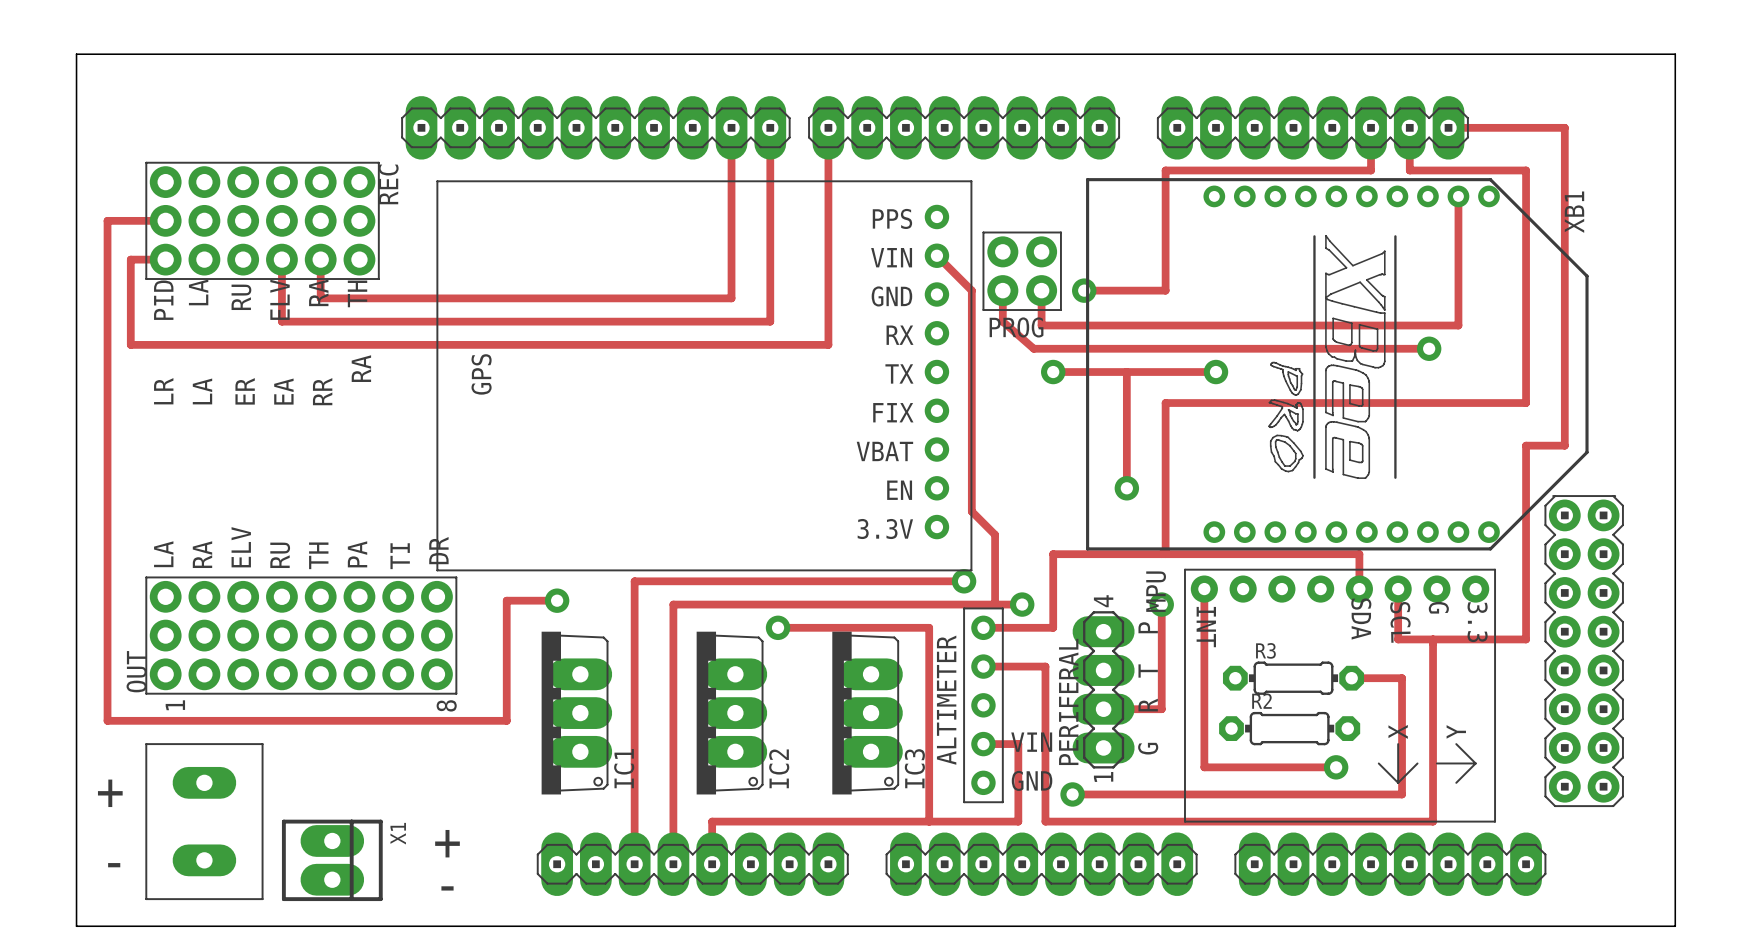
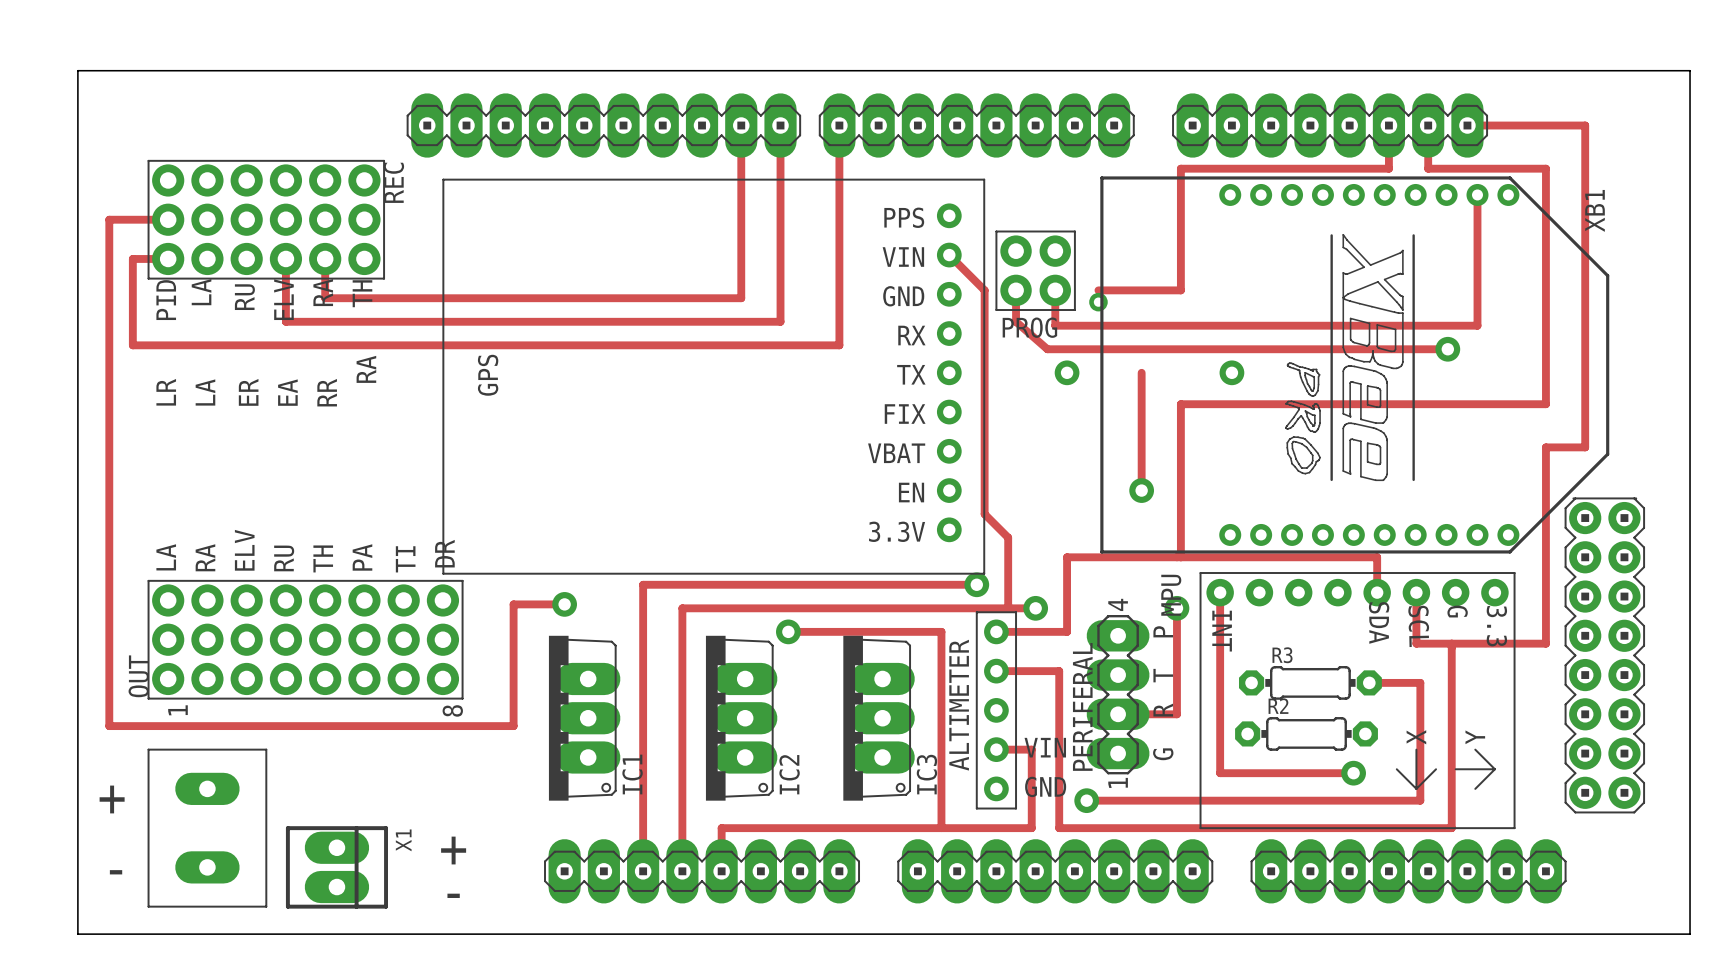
board edge: (76, 73) (76, 54) (1675, 54) (1675, 926) (1668, 926) -> (77, 70) (1690, 70) (1690, 934)
via size: [1072, 278, 1097, 303] -> [1089, 292, 1108, 312]
track: (1053, 372) (1215, 372) -> none

